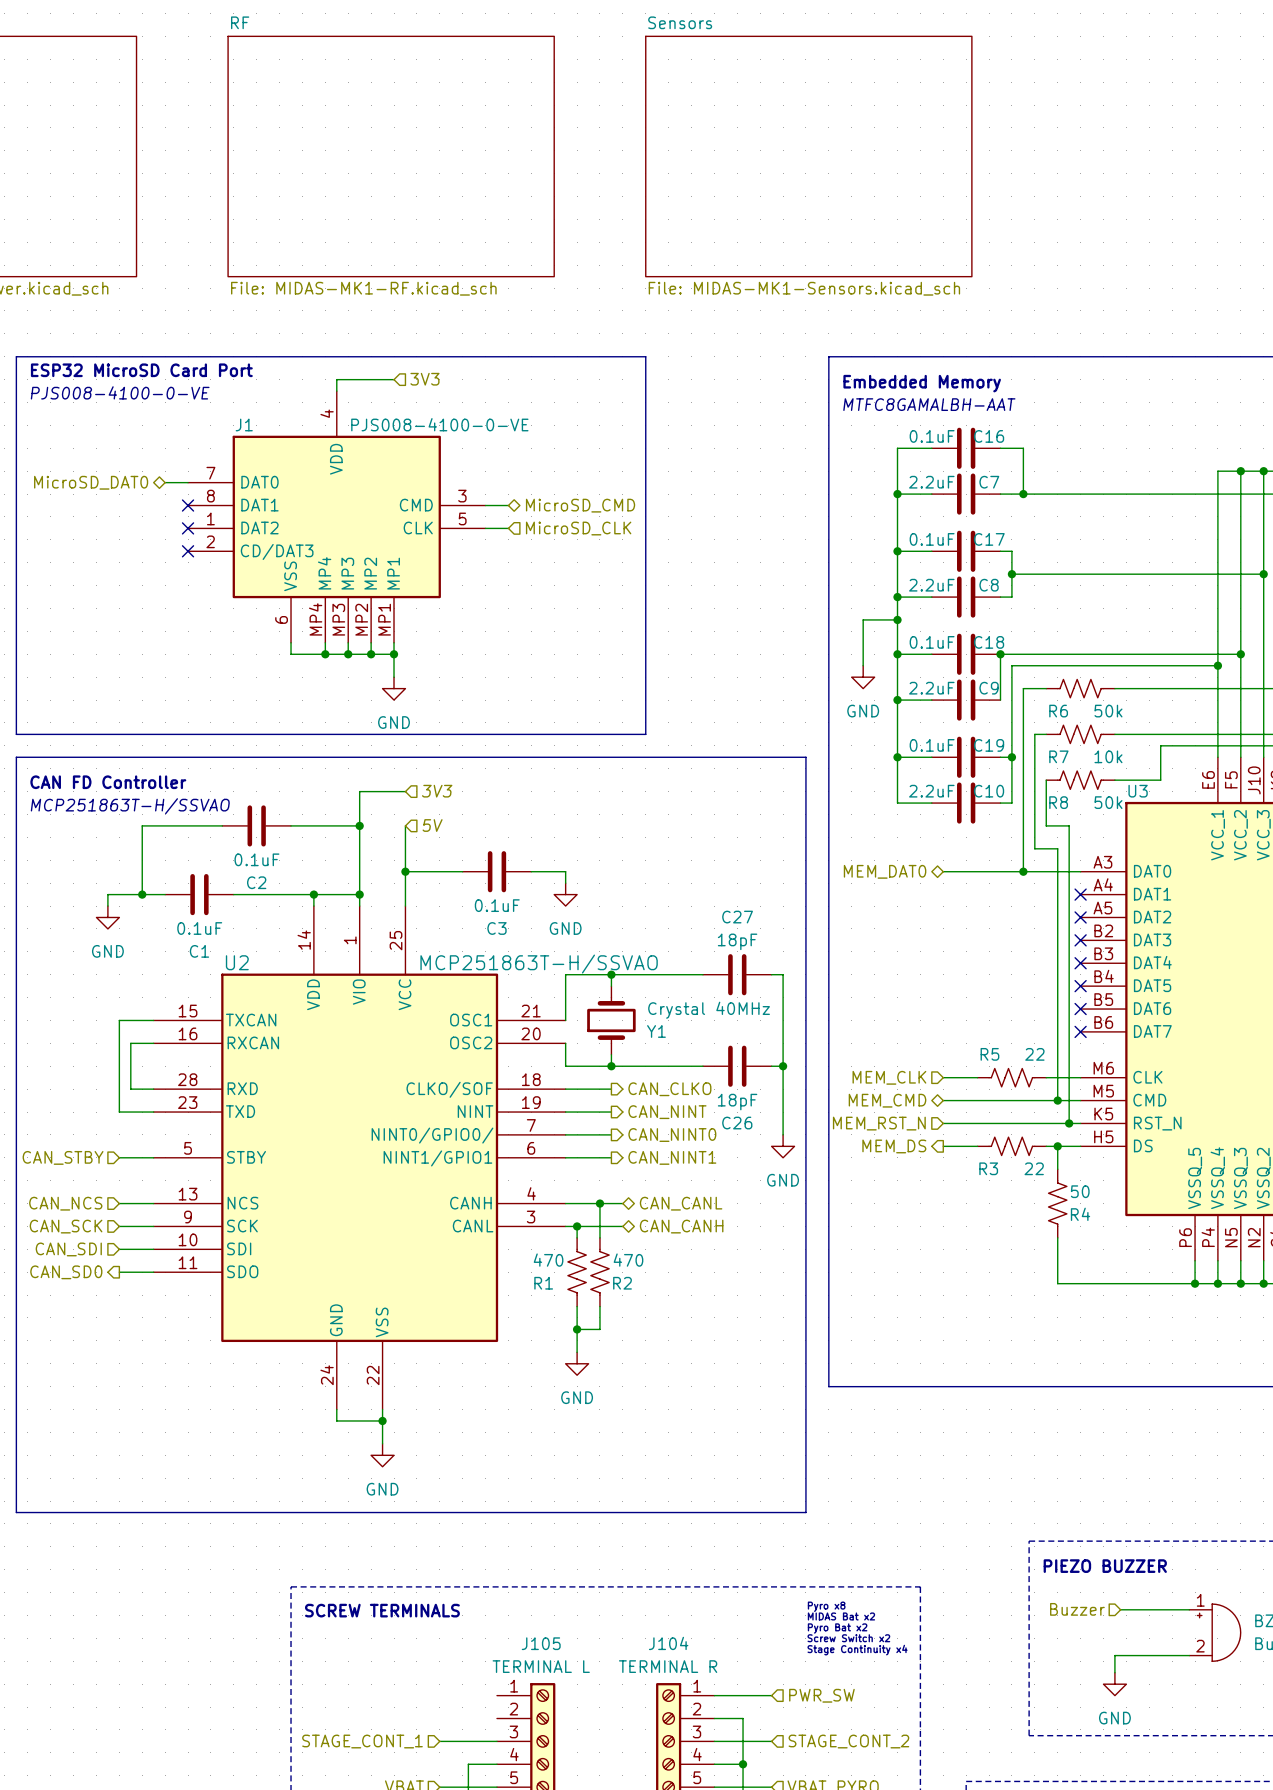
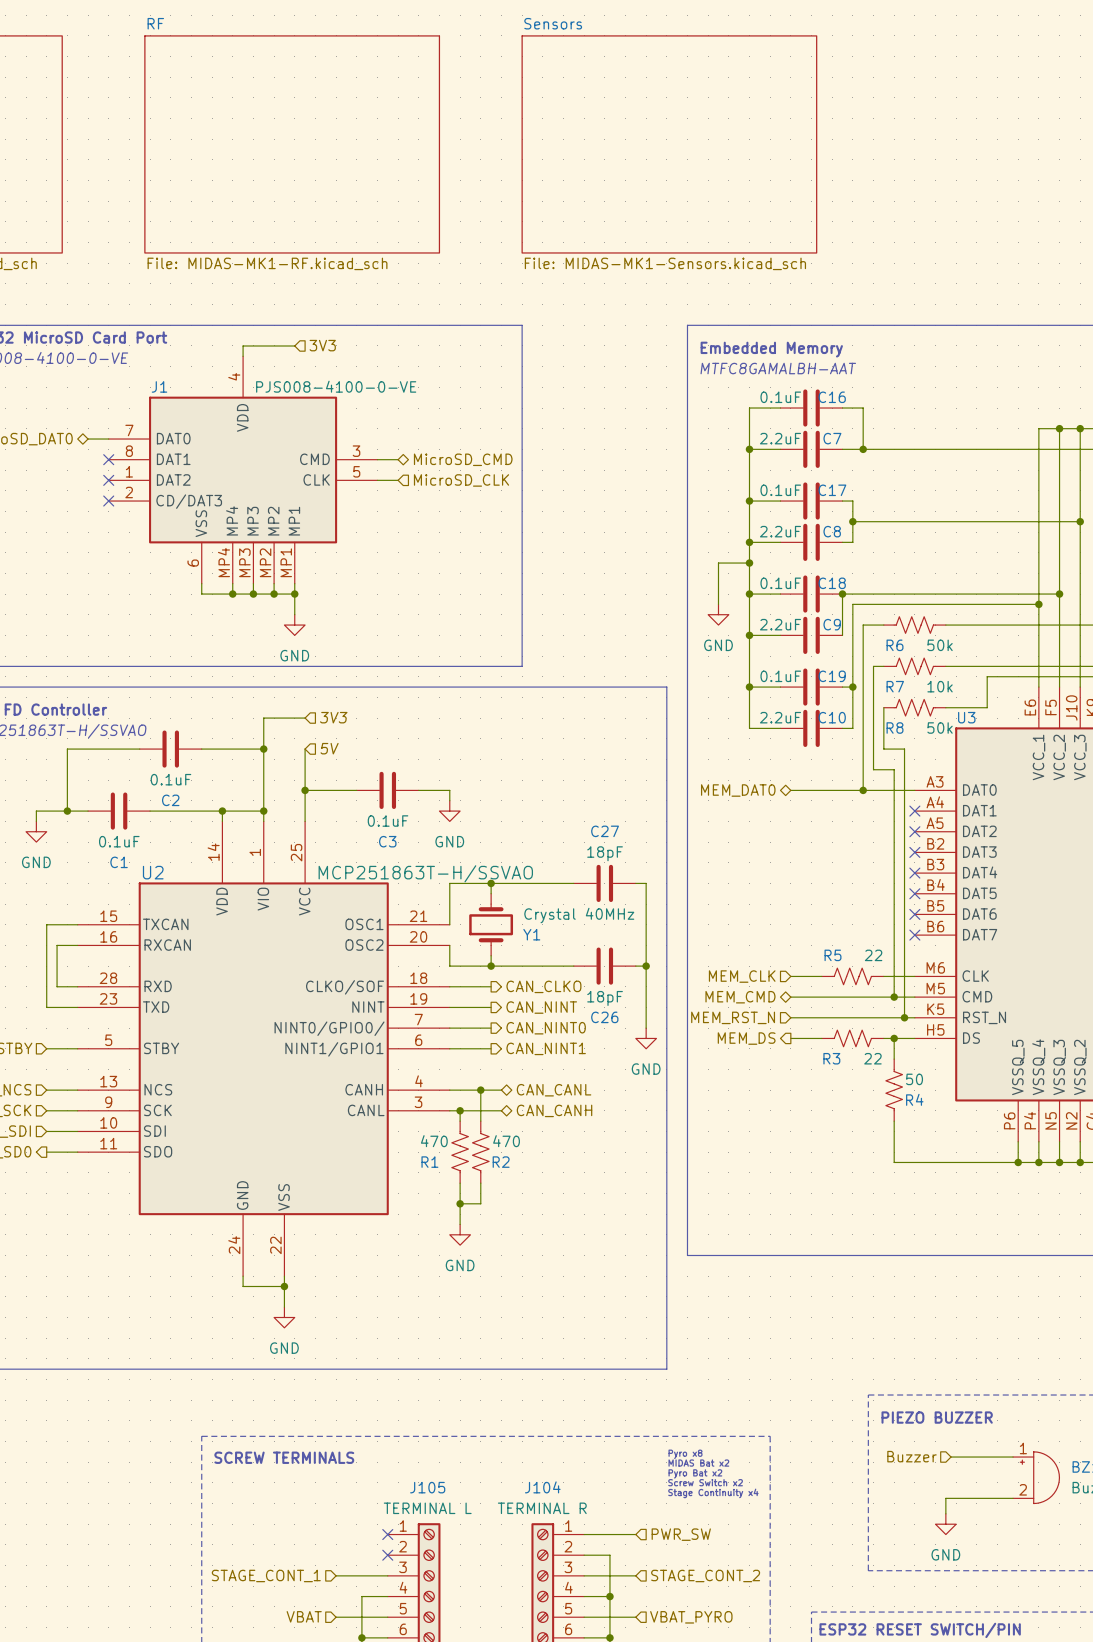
no-connect mark: none -> (387, 1534)
no-connect mark: none -> (387, 1555)

